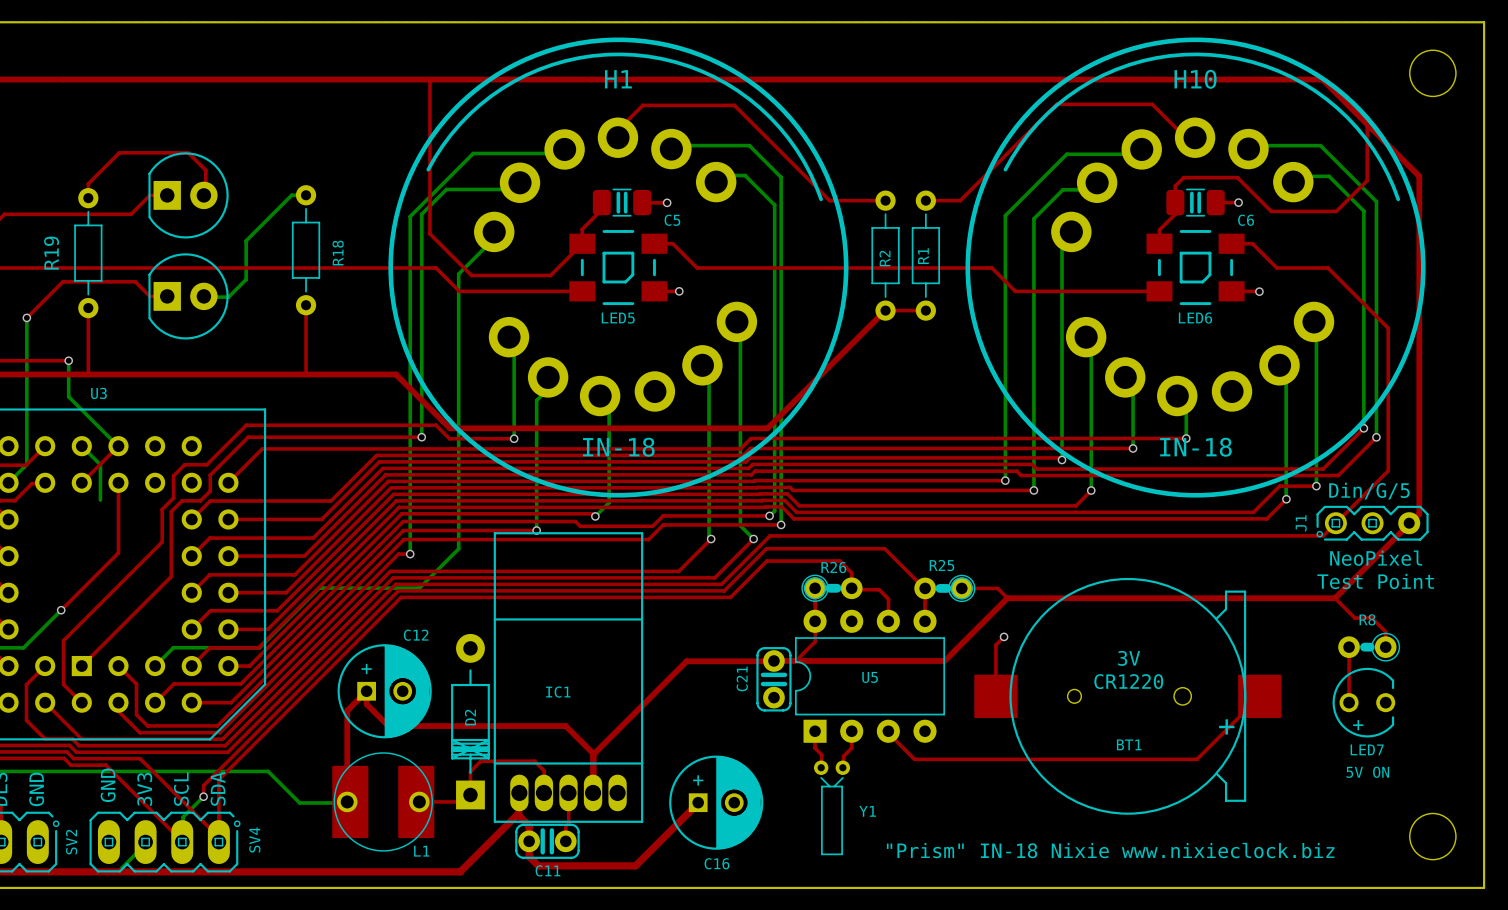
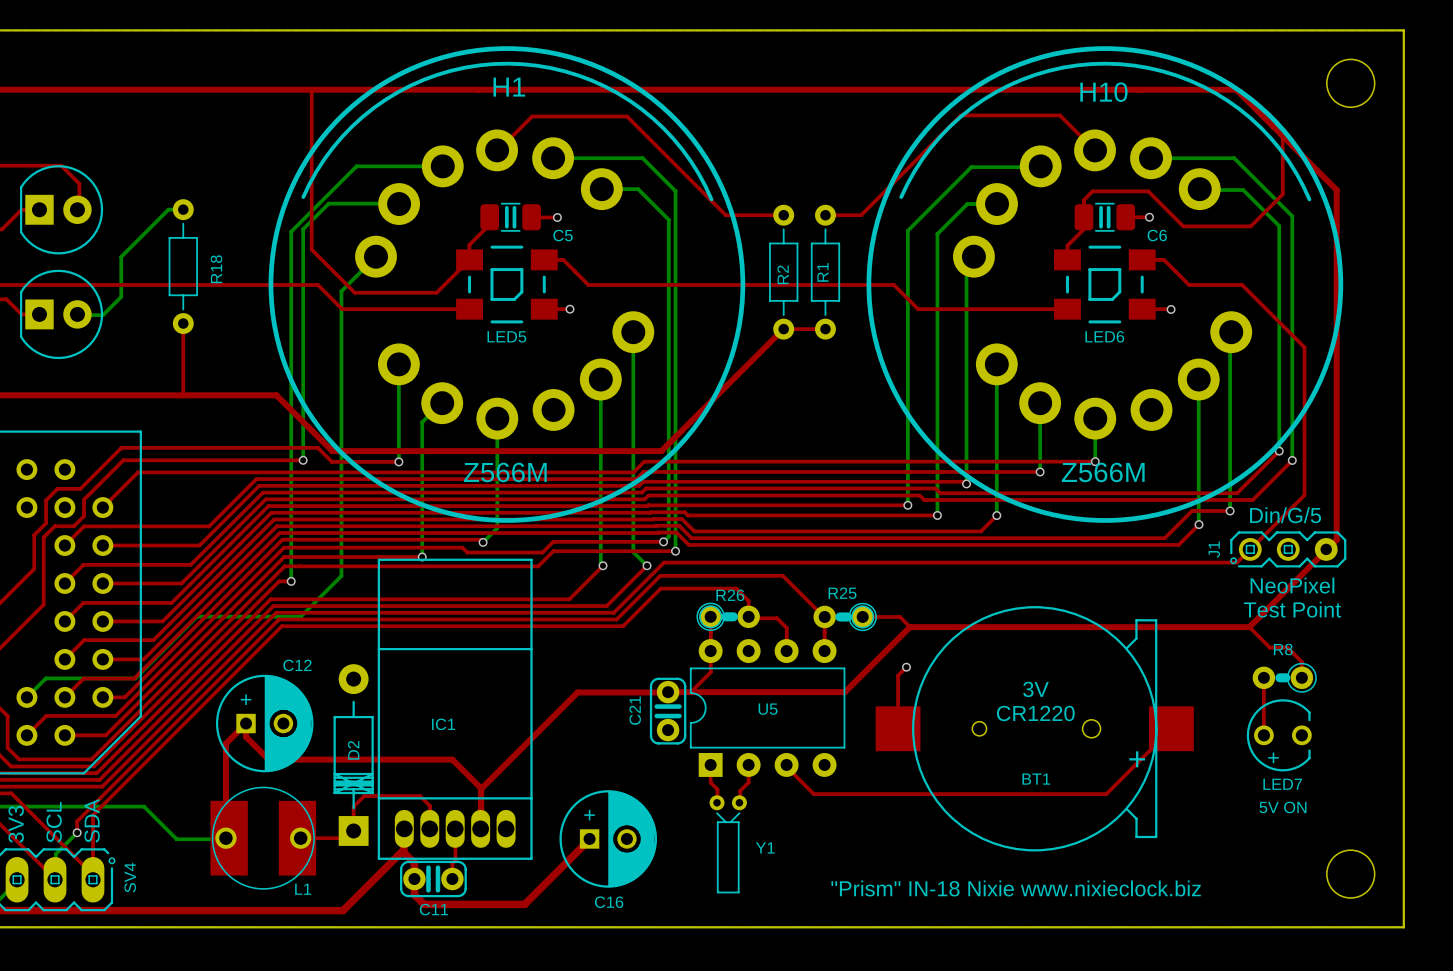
H1 rotation: 0° (618, 267) -> 4° counterclockwise (506, 284)
H10 rotation: 0° (1195, 267) -> 4° counterclockwise (1104, 284)
H1 value: IN-18 (618, 447) -> Z566M (505, 472)
H10 value: IN-18 (1195, 447) -> Z566M (1103, 472)

